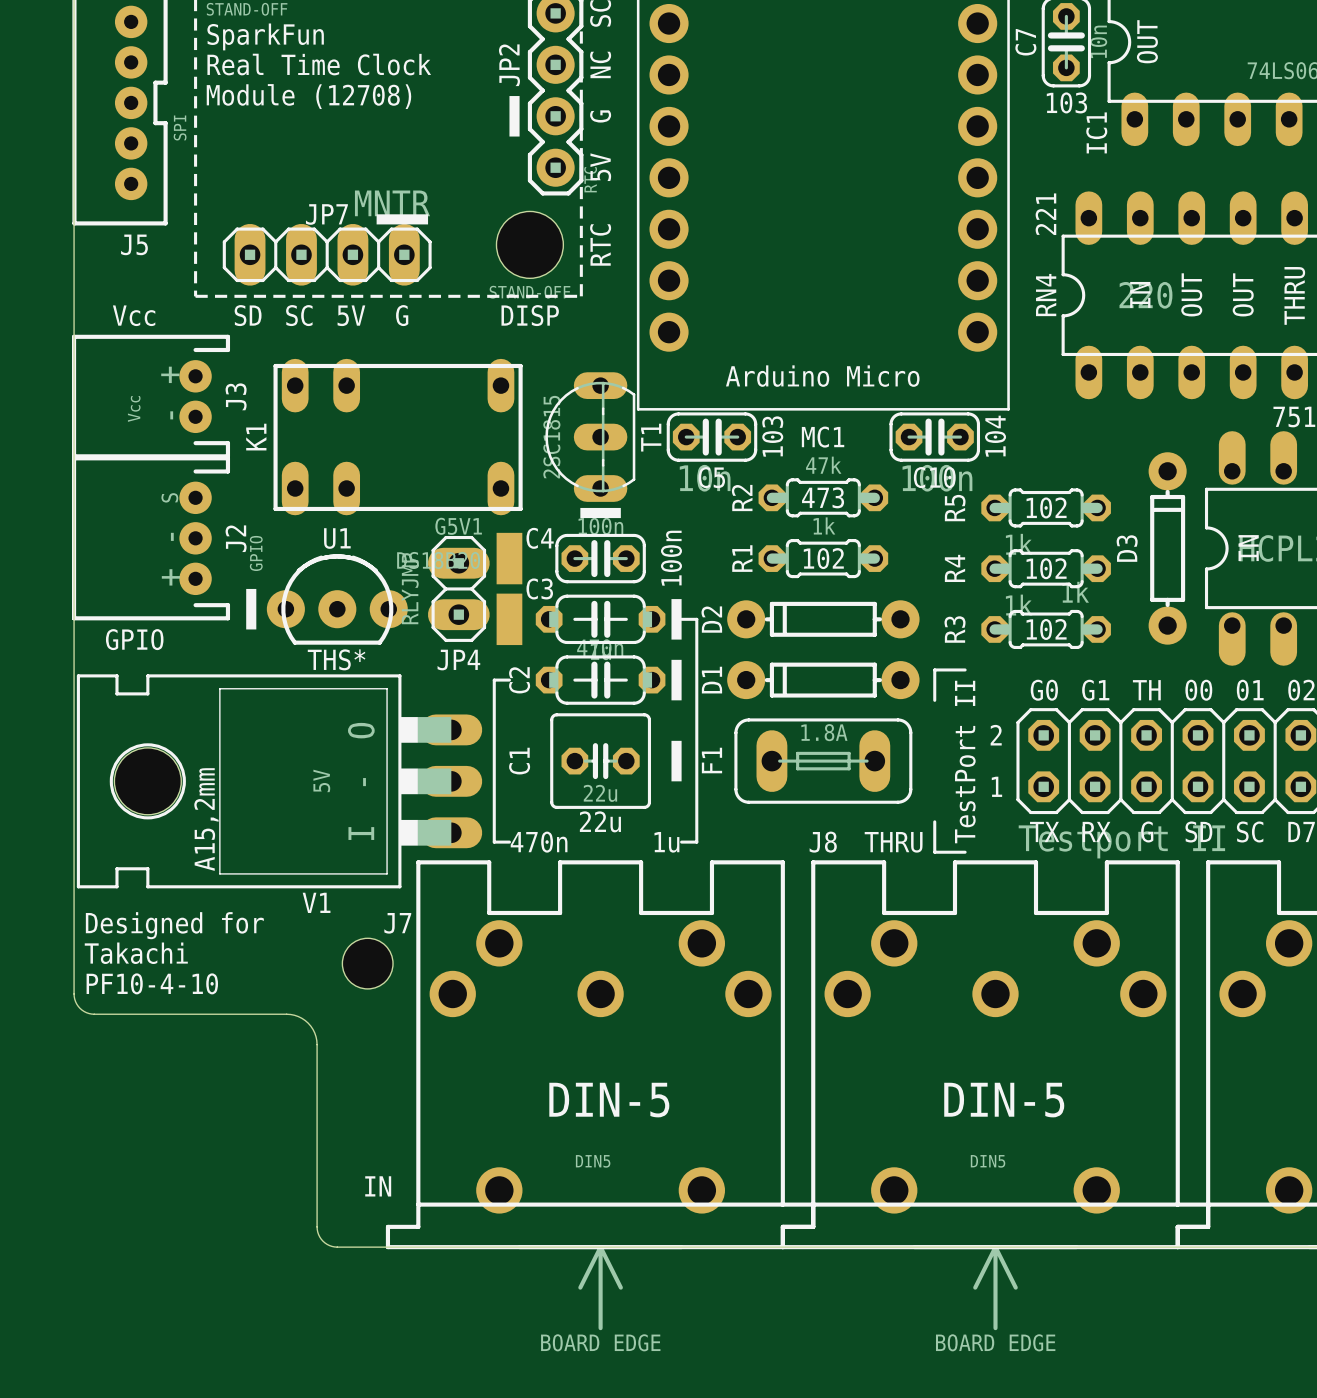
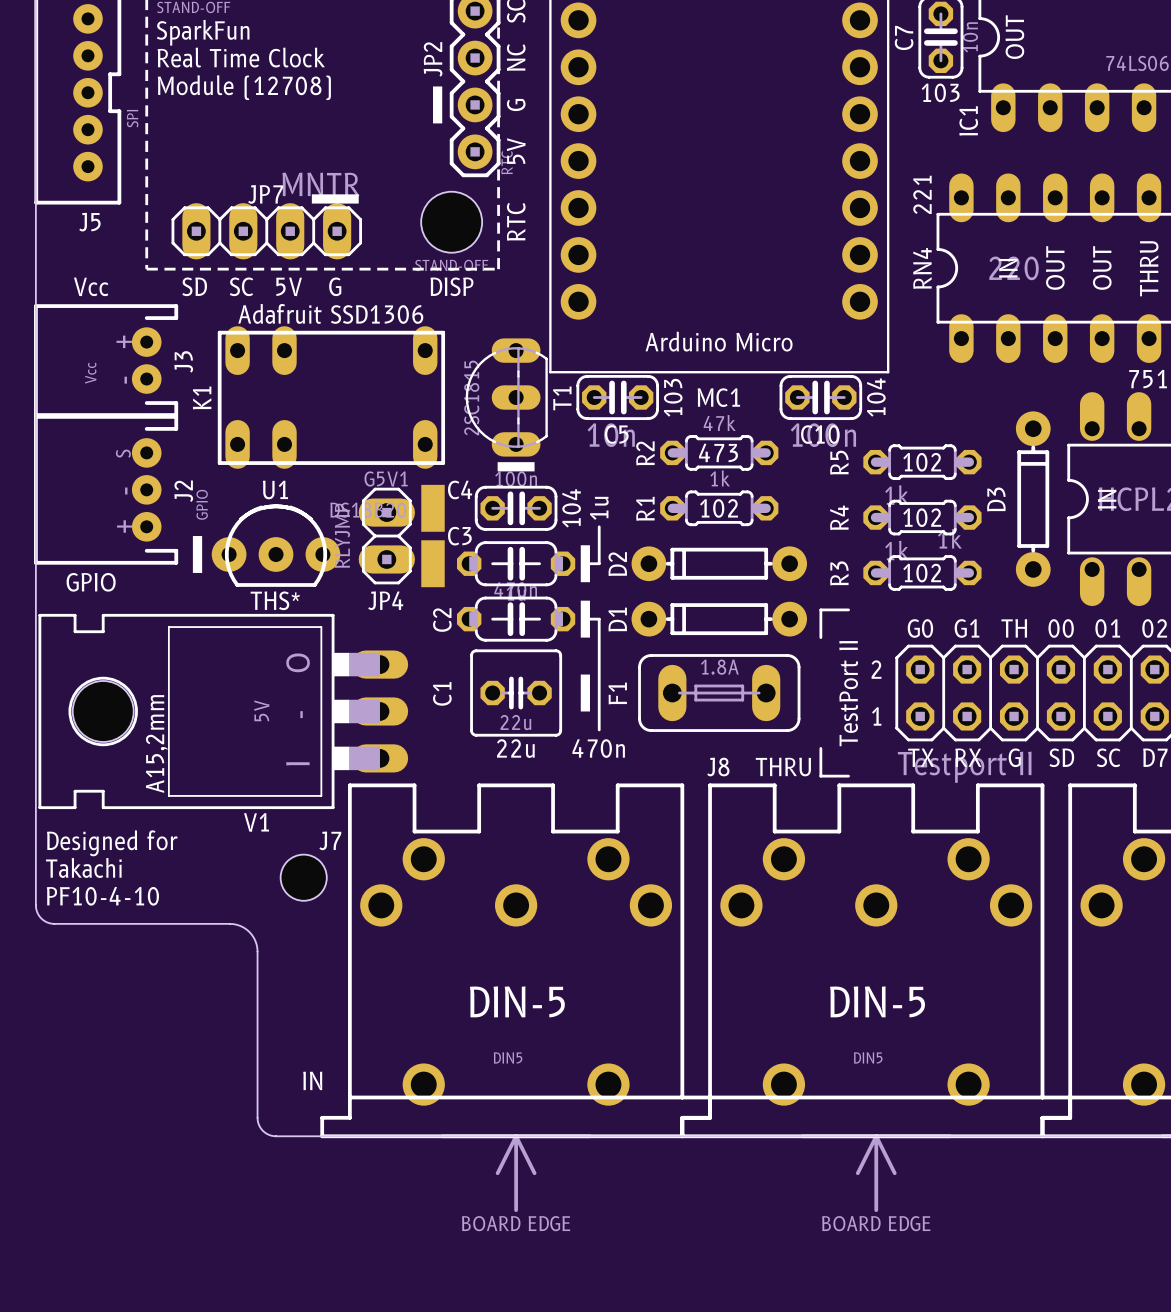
text: none -> Adafruit SSD1306 (330, 313)
text: none -> 104 (571, 508)
text: 100n (671, 558) -> 1u (599, 508)
line: (691, 619) (696, 619) (696, 842) (681, 842) -> (599, 563) (599, 526)
line: (509, 680) (494, 680) (494, 842) (509, 842) -> none
line: none -> (589, 619) (599, 619) (599, 729)
text position: 470n (539, 842) -> 470n (598, 748)
text: 1u (666, 842) -> none

